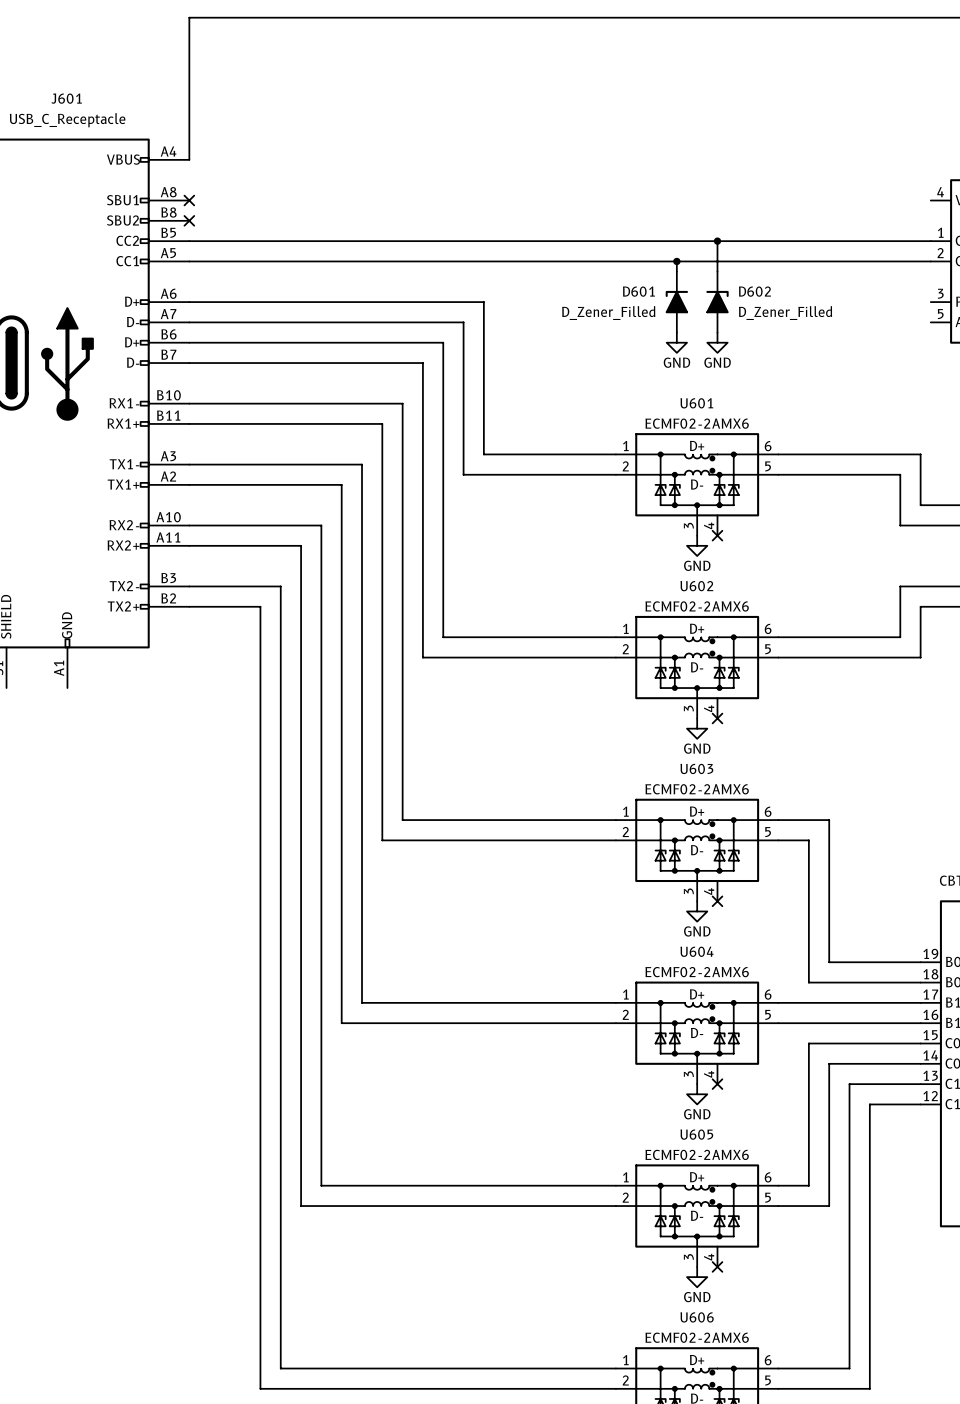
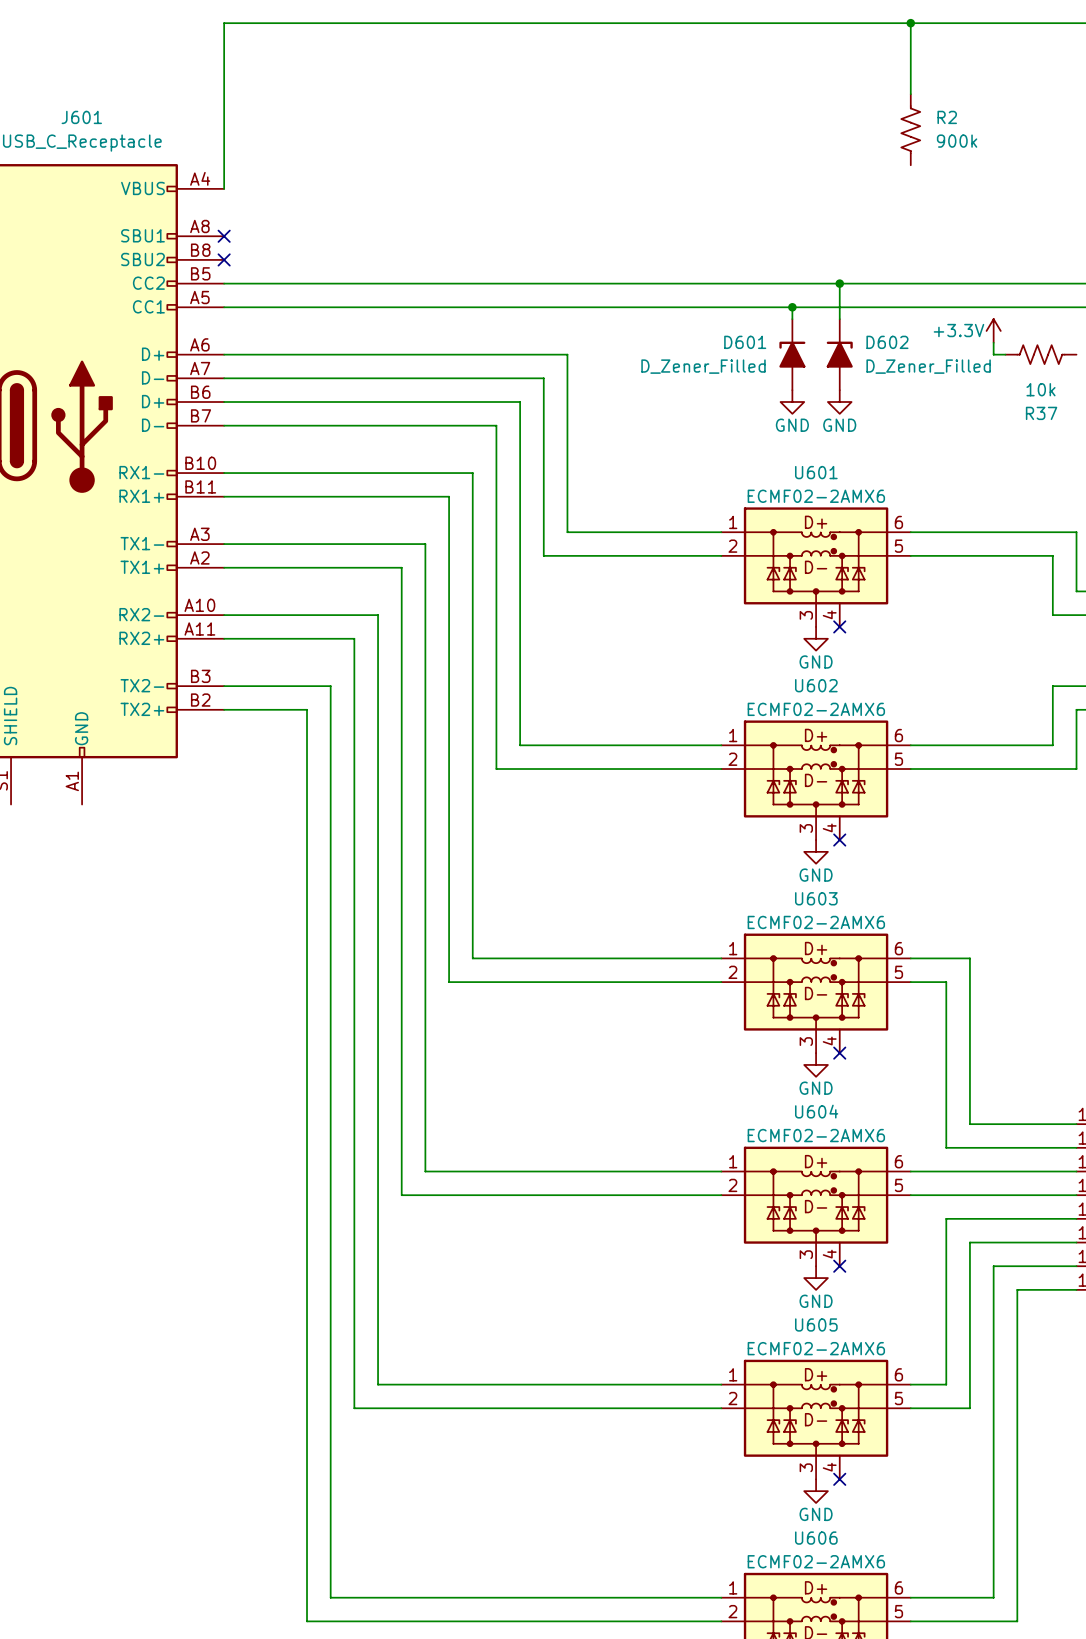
wire: none -> (910, 23) (910, 94)
junction: none -> (910, 23)
R2: none -> 900k (910, 129)
power symbol: none -> +3.3V (993, 330)
wire: none -> (993, 342) (993, 354) (1005, 354)
R37: none -> 10k (1041, 354)

